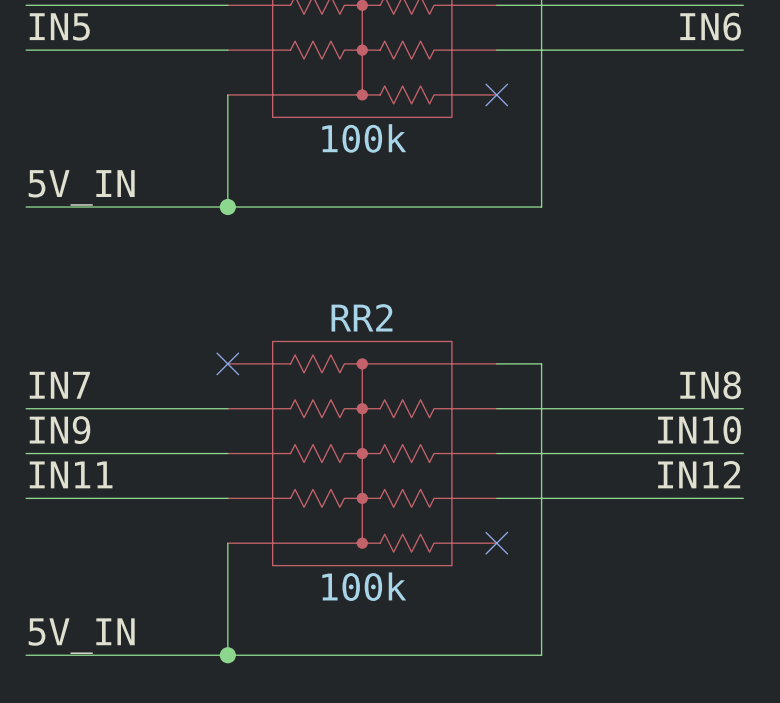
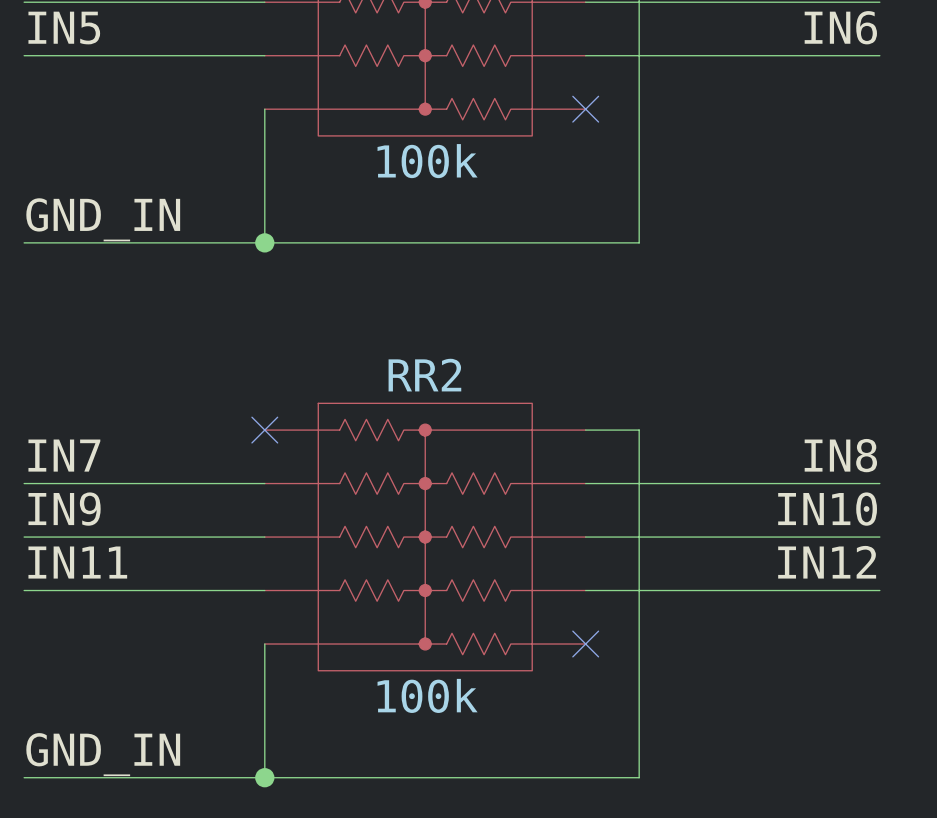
label: 5V_IN (81, 187) -> GND_IN (103, 219)
label: 5V_IN (81, 636) -> GND_IN (103, 754)

